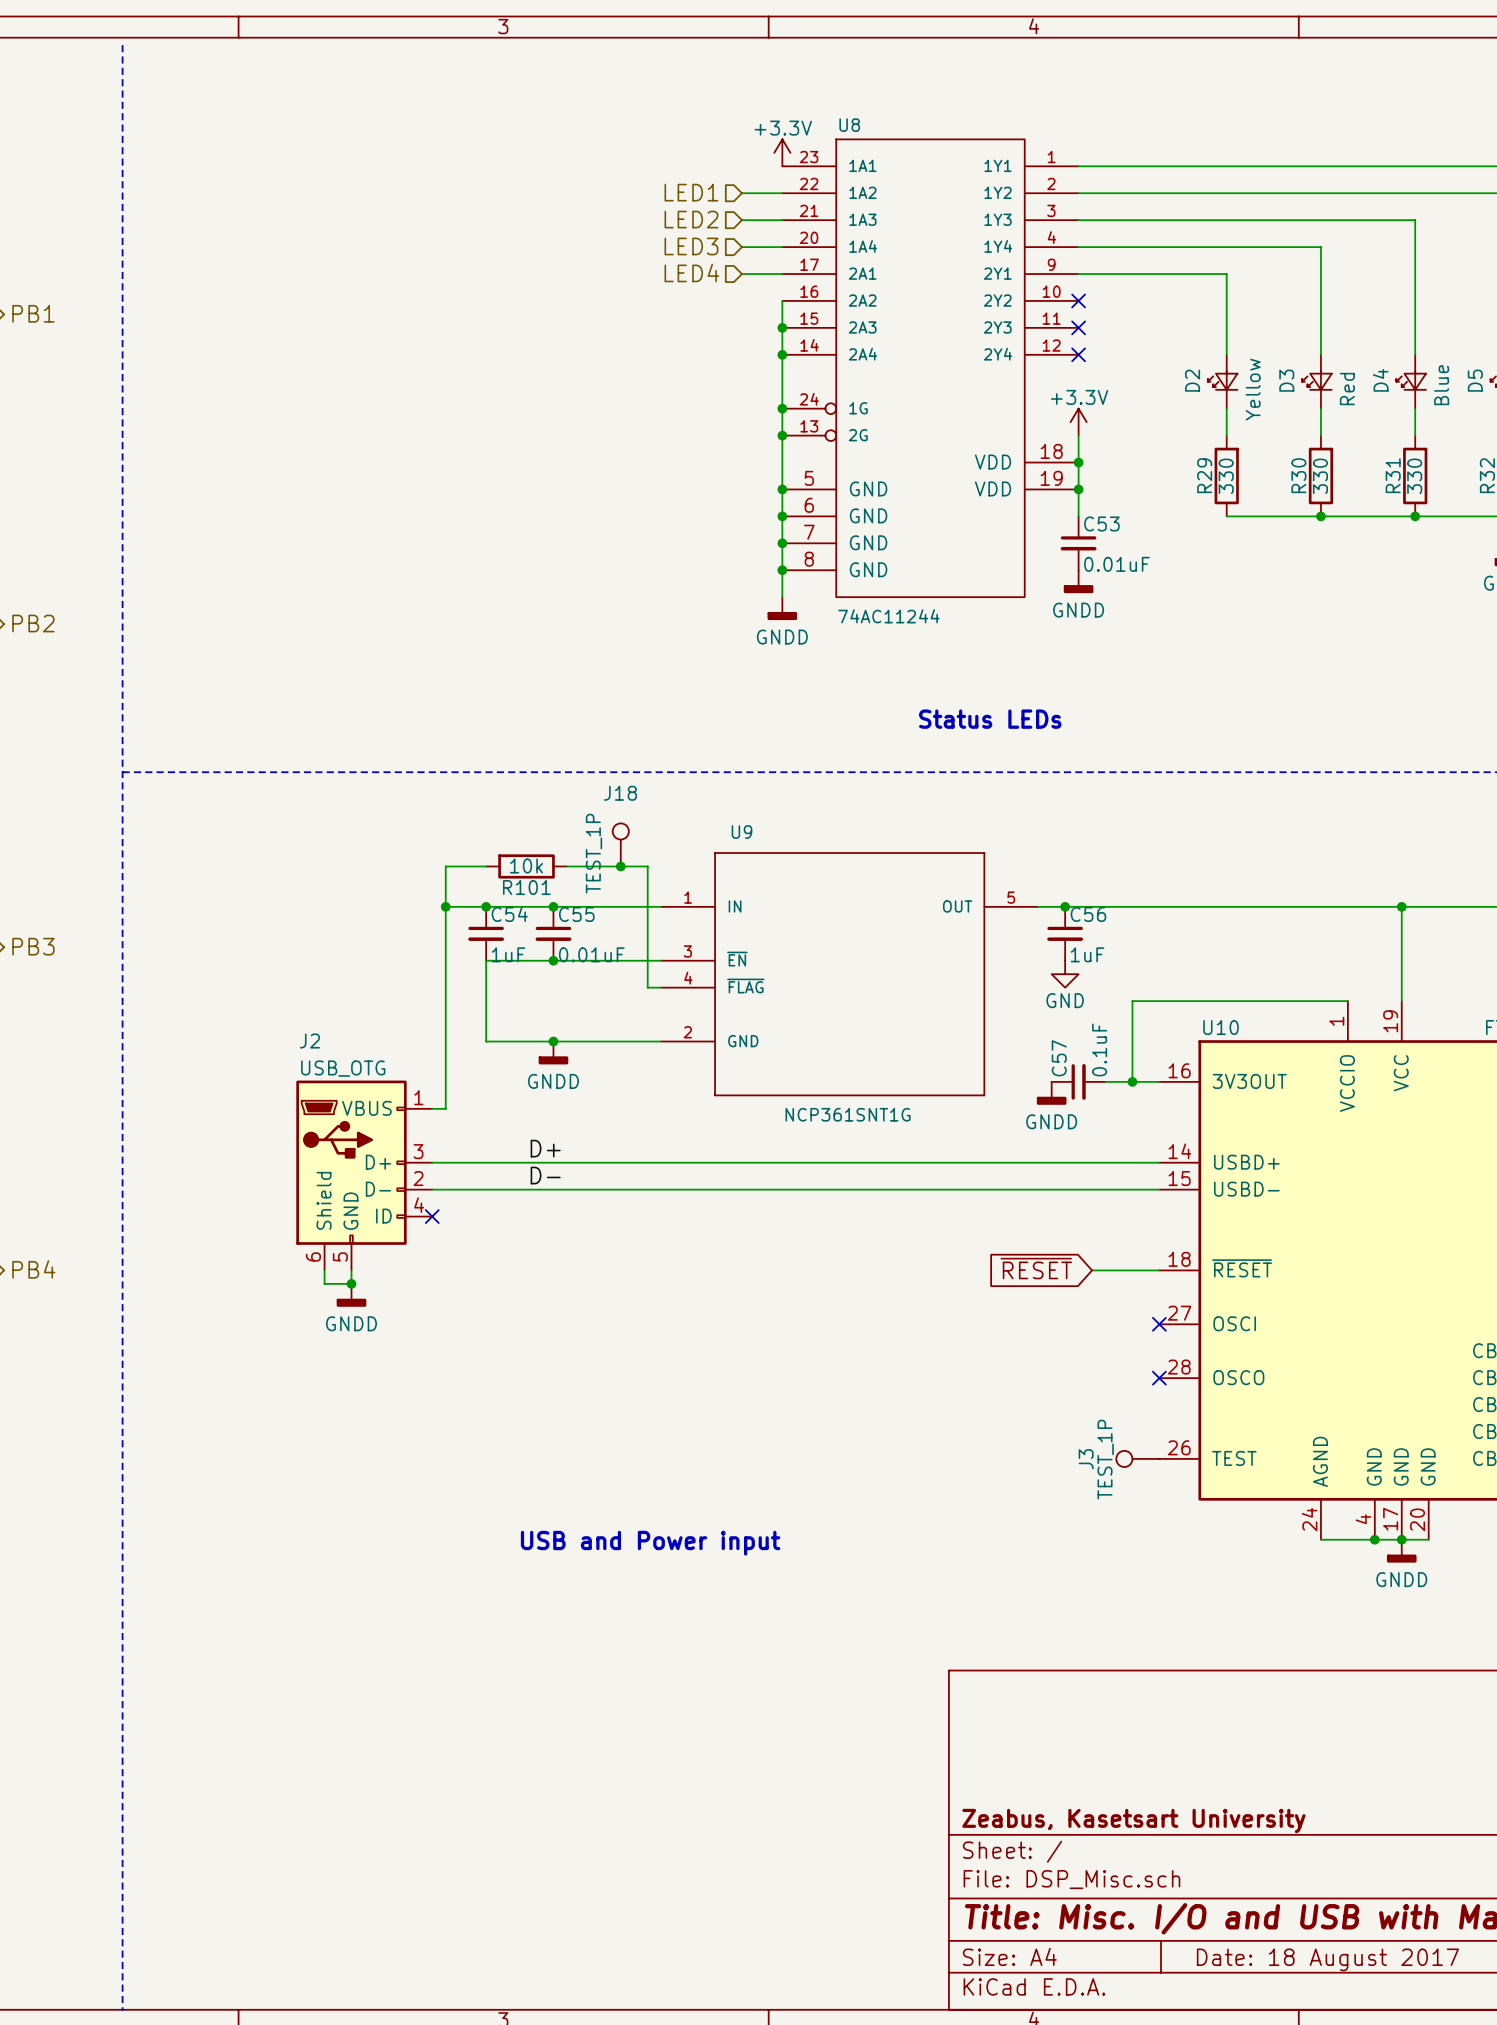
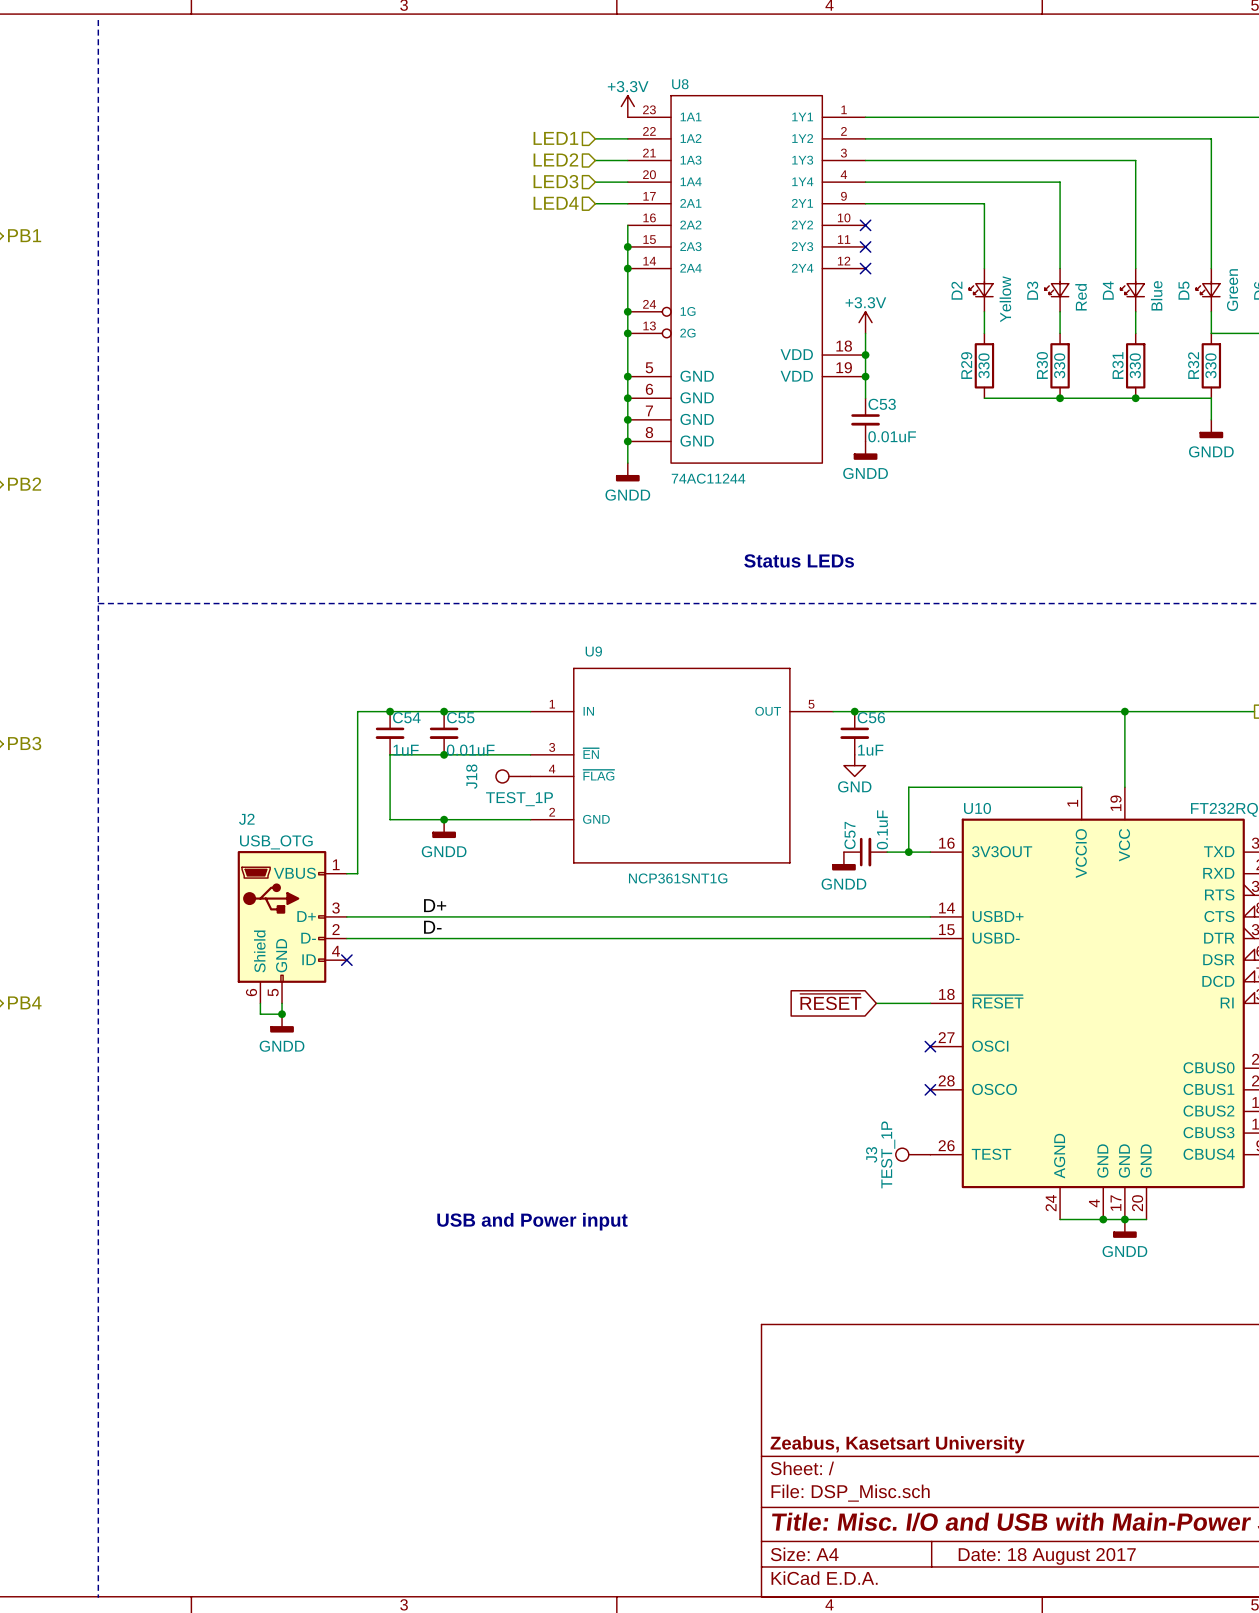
J18 rotation: 0° (620, 831) -> 90° counterclockwise (502, 776)
J18 position: (620, 844) -> (513, 776)
wire: (486, 866) (445, 866) (445, 906) -> none
R101: 10k (526, 866) -> none
wire: (566, 866) (647, 866) (647, 987) (661, 987) -> none
junction: (620, 866) -> none
junction: (445, 906) -> none

